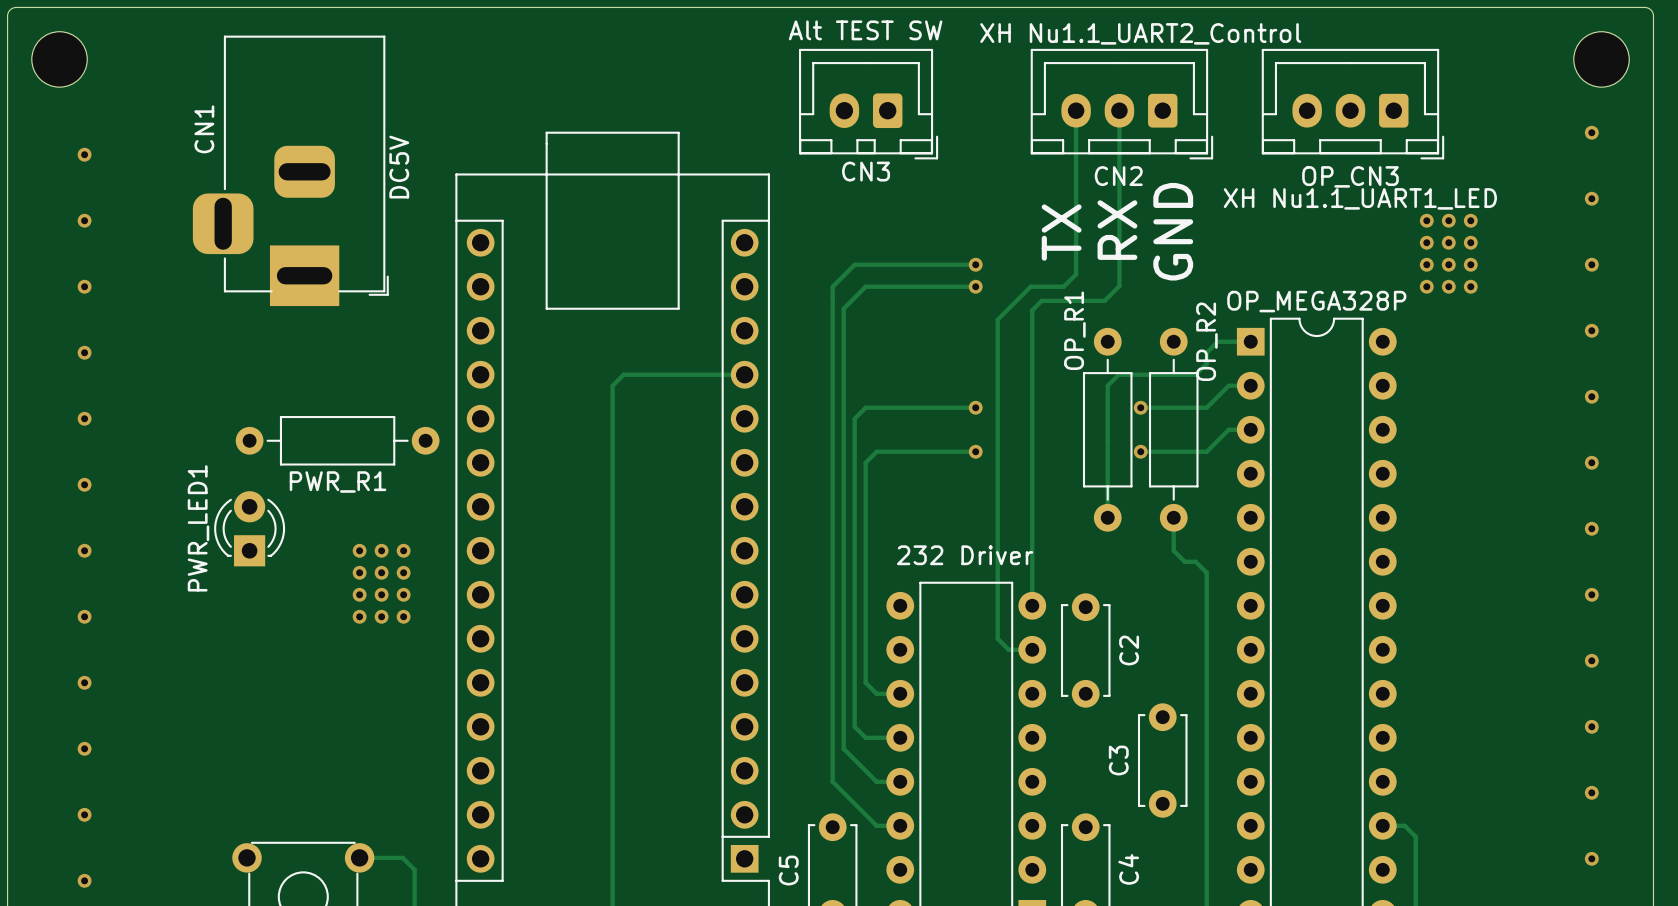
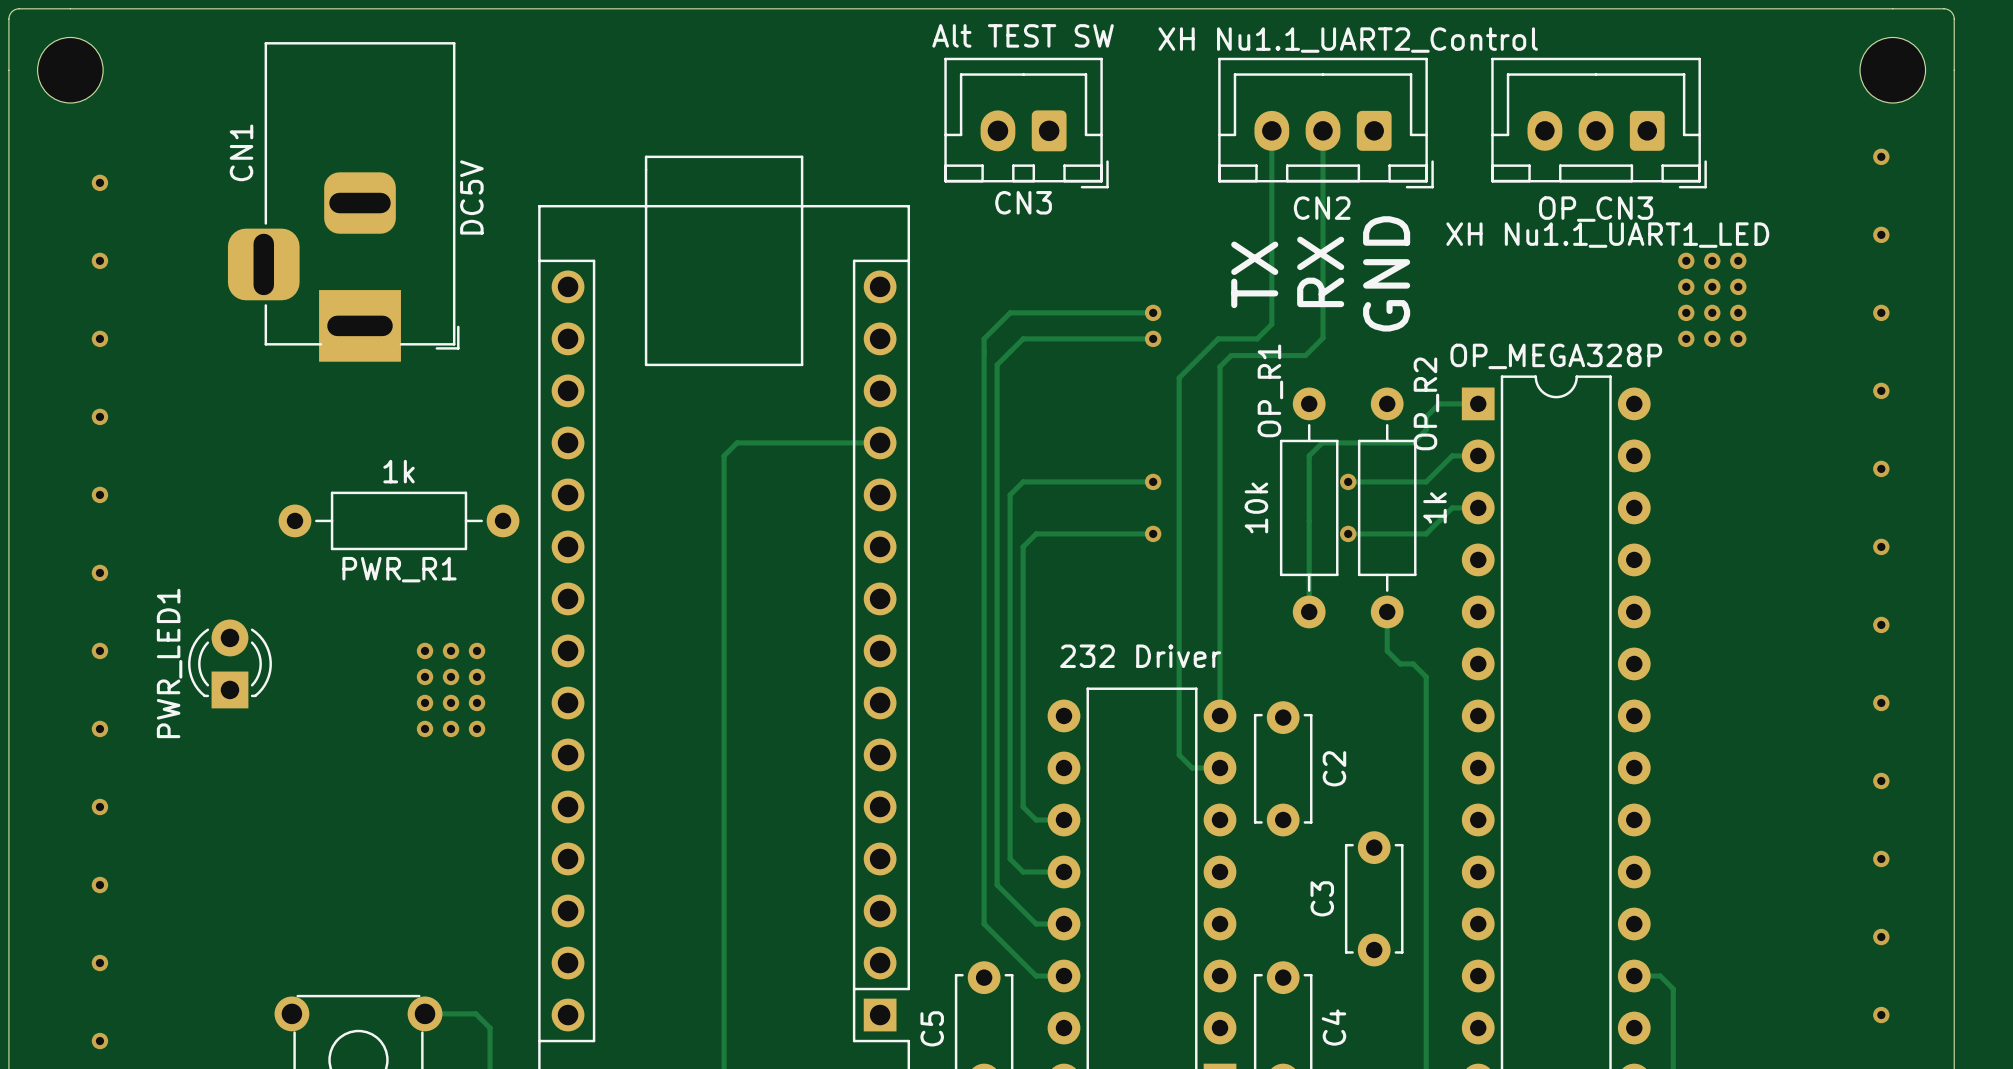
PWR_R1 value: none -> 1k (399, 471)
OP_R1 value: none -> 10k (1256, 507)
OP_R2 value: none -> 1k (1434, 507)
PWR_LED1 footprint: [214, 491, 286, 567] -> [188, 619, 272, 709]

